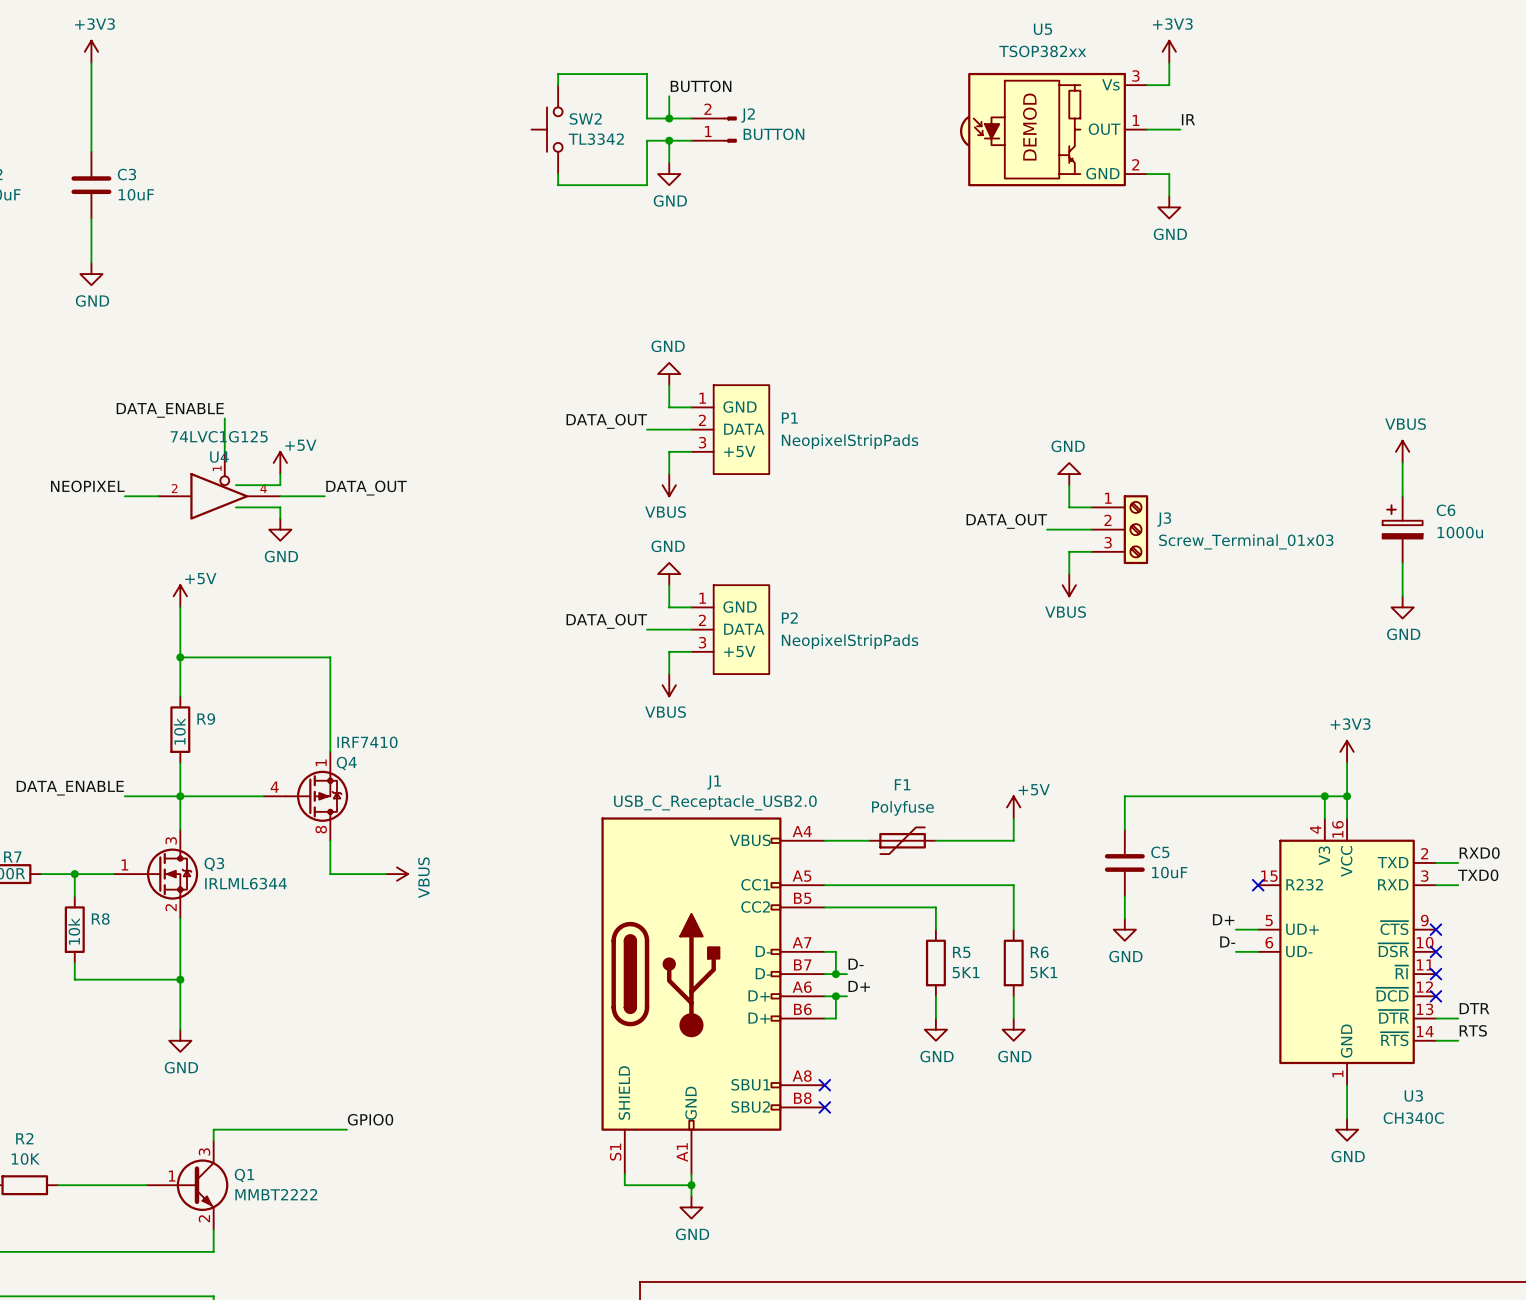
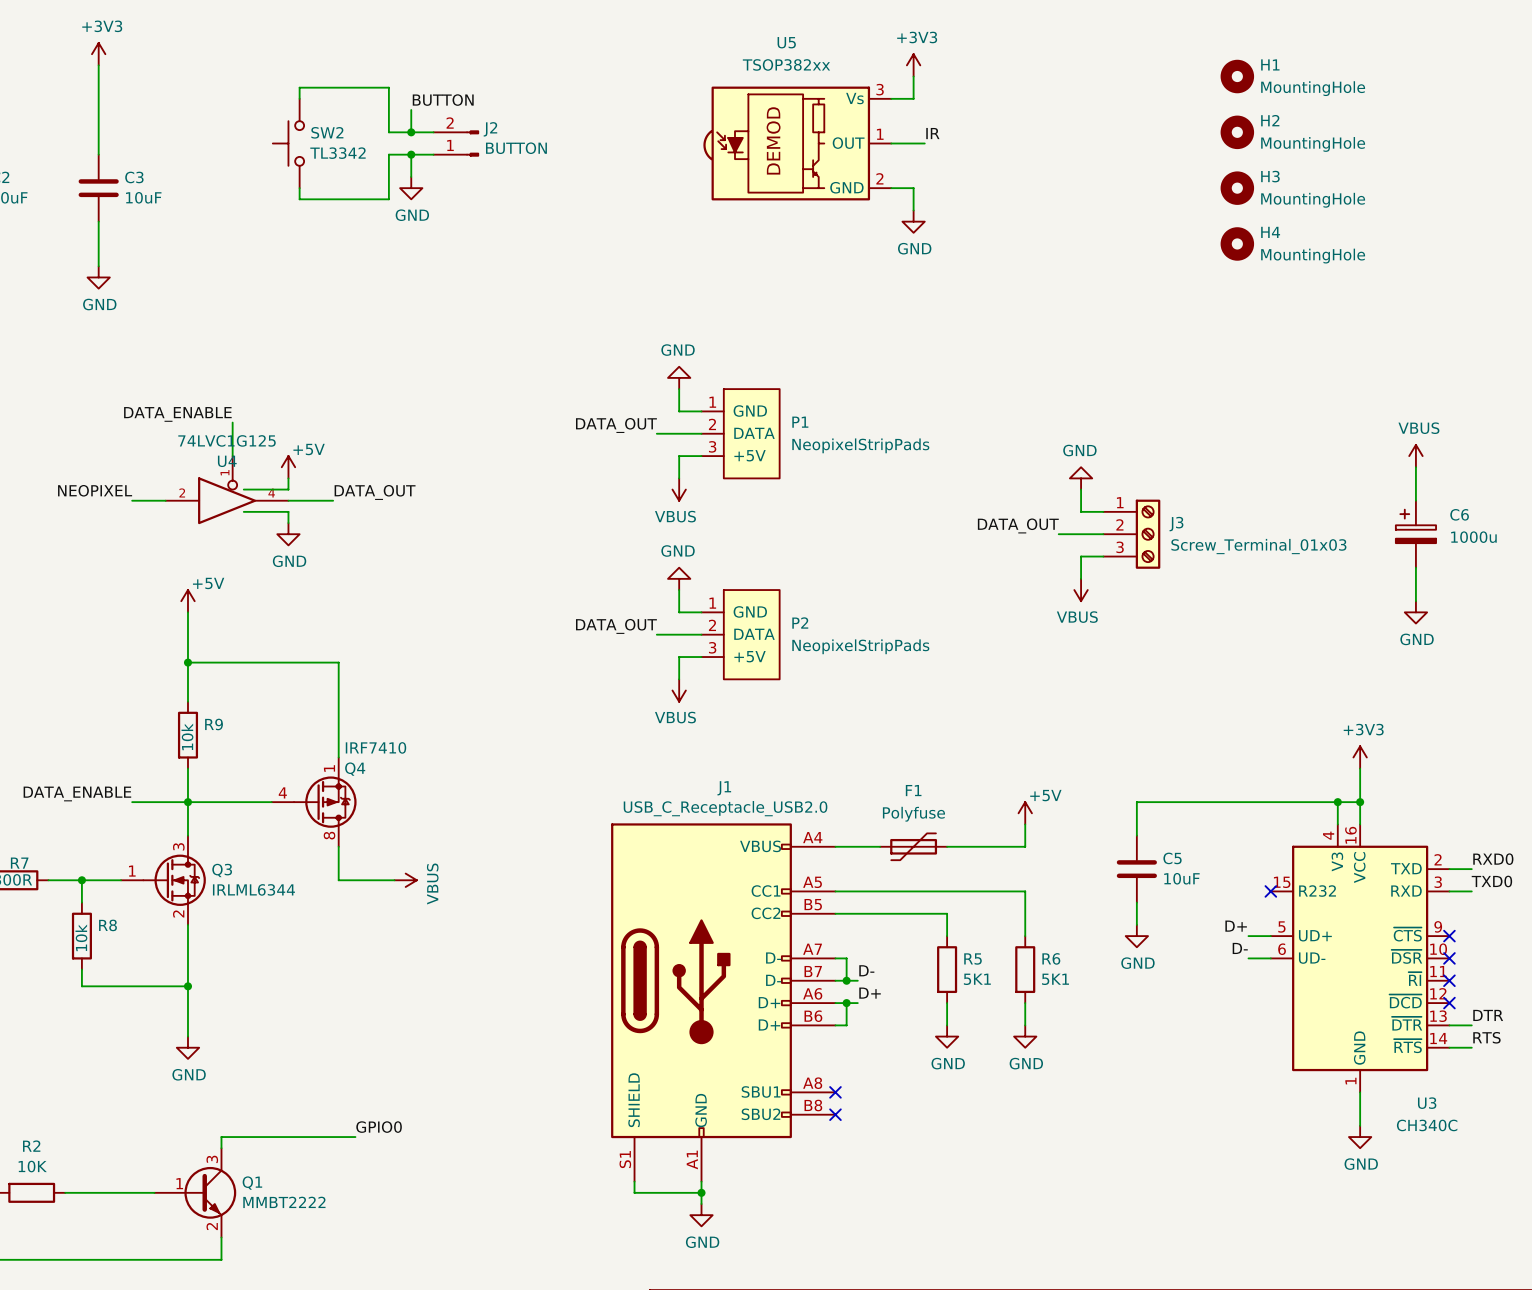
power symbol: +3V3 (1169, 51) -> none
power symbol: none -> +3V3 (913, 65)
wire: (1169, 62) (1169, 85) (1147, 85) -> none
wire: none -> (913, 76) (913, 98) (891, 98)
H1: none -> MountingHole (1237, 76)
wire: (558, 85) (558, 74) (647, 74) (647, 118) (691, 118) -> none
label: BUTTON (701, 86) -> none
wire: none -> (299, 98) (299, 87) (388, 87) (388, 132) (433, 132)
wire: (669, 96) (669, 118) -> none
label: none -> BUTTON (443, 100)
wire: none -> (411, 110) (411, 132)
junction: (669, 118) -> none
label: IR (1188, 119) -> none
junction: none -> (411, 132)
SW2 position: (547, 129) -> (288, 143)
J2 position: (714, 129) -> (456, 143)
U5 position: (1053, 129) -> (797, 143)
wire: (1147, 129) (1180, 129) -> none
H2: none -> MountingHole (1237, 132)
label: none -> IR (932, 133)
wire: (669, 140) (669, 162) -> none
junction: (669, 140) -> none
wire: (691, 140) (647, 140) (647, 185) (558, 185) (558, 174) -> none
wire: none -> (891, 143) (924, 143)
wire: none -> (411, 154) (411, 176)
junction: none -> (411, 154)
wire: none -> (433, 154) (388, 154) (388, 199) (299, 199) (299, 188)
power symbol: GND (669, 174) -> none
wire: (1147, 174) (1169, 174) (1169, 196) -> none
power symbol: none -> GND (411, 188)
wire: none -> (891, 188) (913, 188) (913, 210)
H3: none -> MountingHole (1237, 188)
power symbol: GND (1169, 207) -> none
power symbol: none -> GND (913, 221)
H4: none -> MountingHole (1237, 243)

